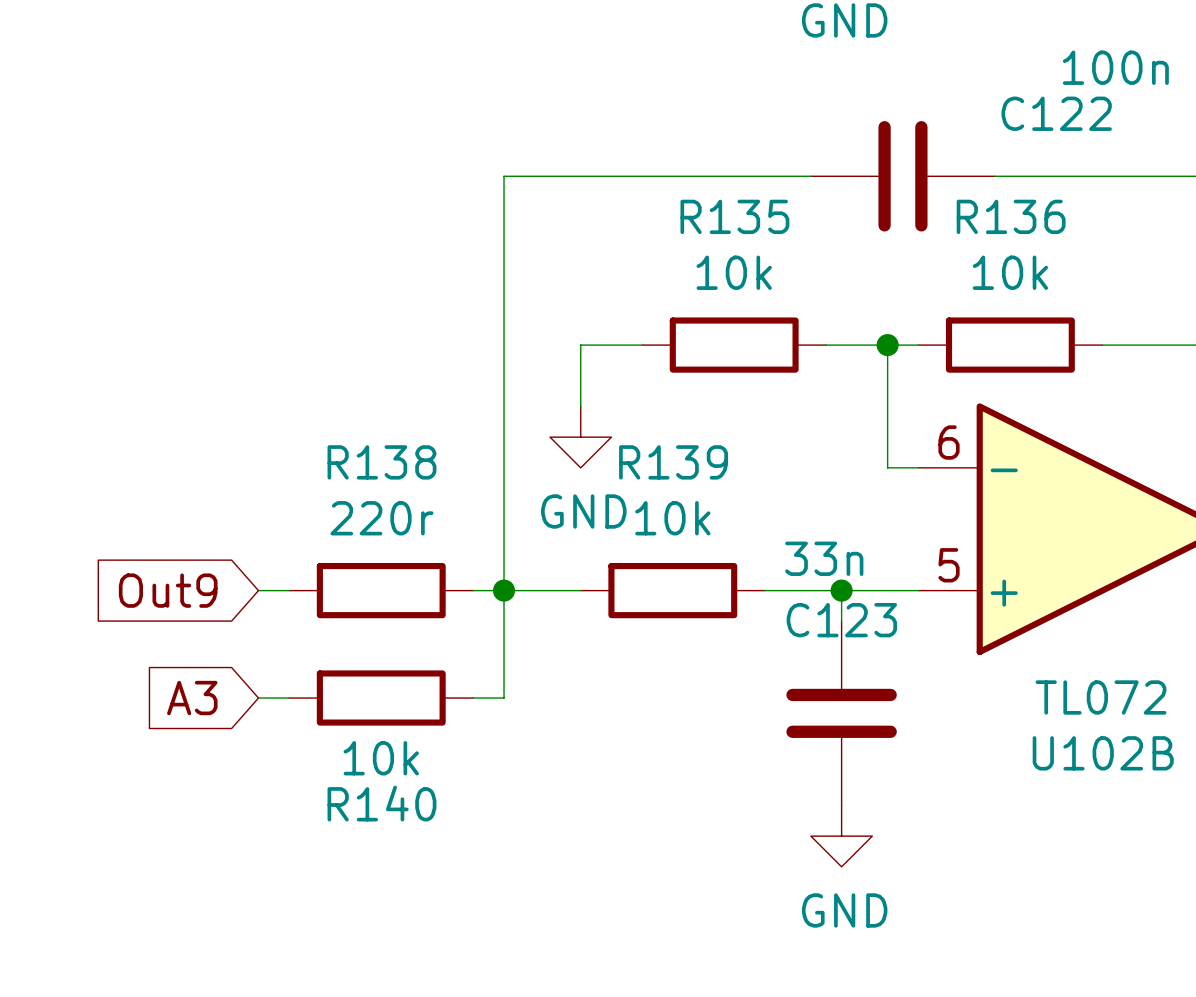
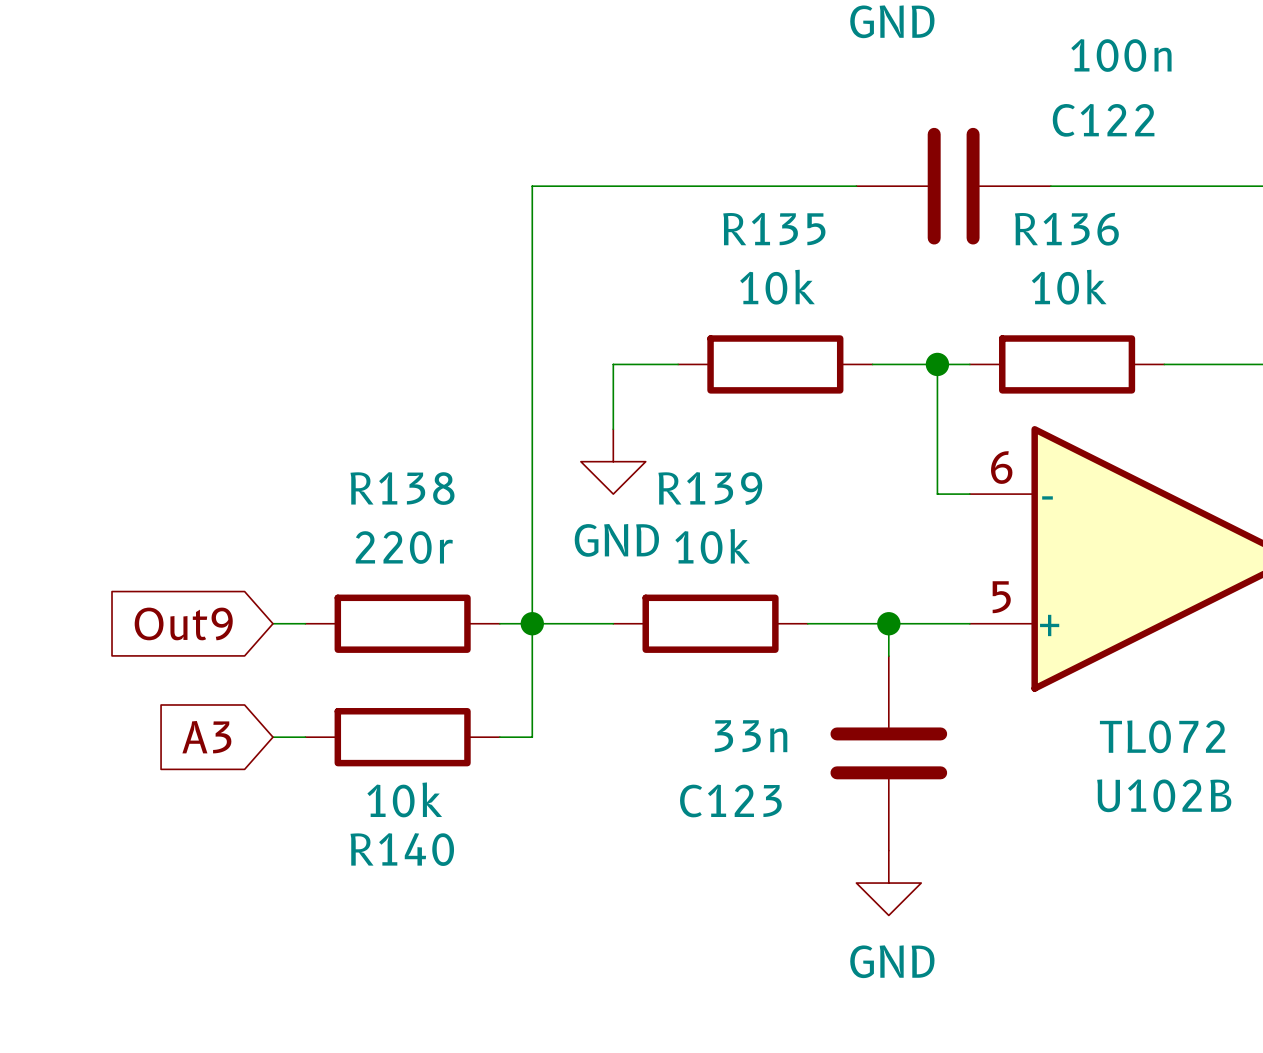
C122 value position: 100n (1115, 67) -> 100n (1121, 55)
C123 value position: 33n (824, 558) -> 33n (751, 736)
C123 name position: C123 (841, 620) -> C123 (730, 800)

